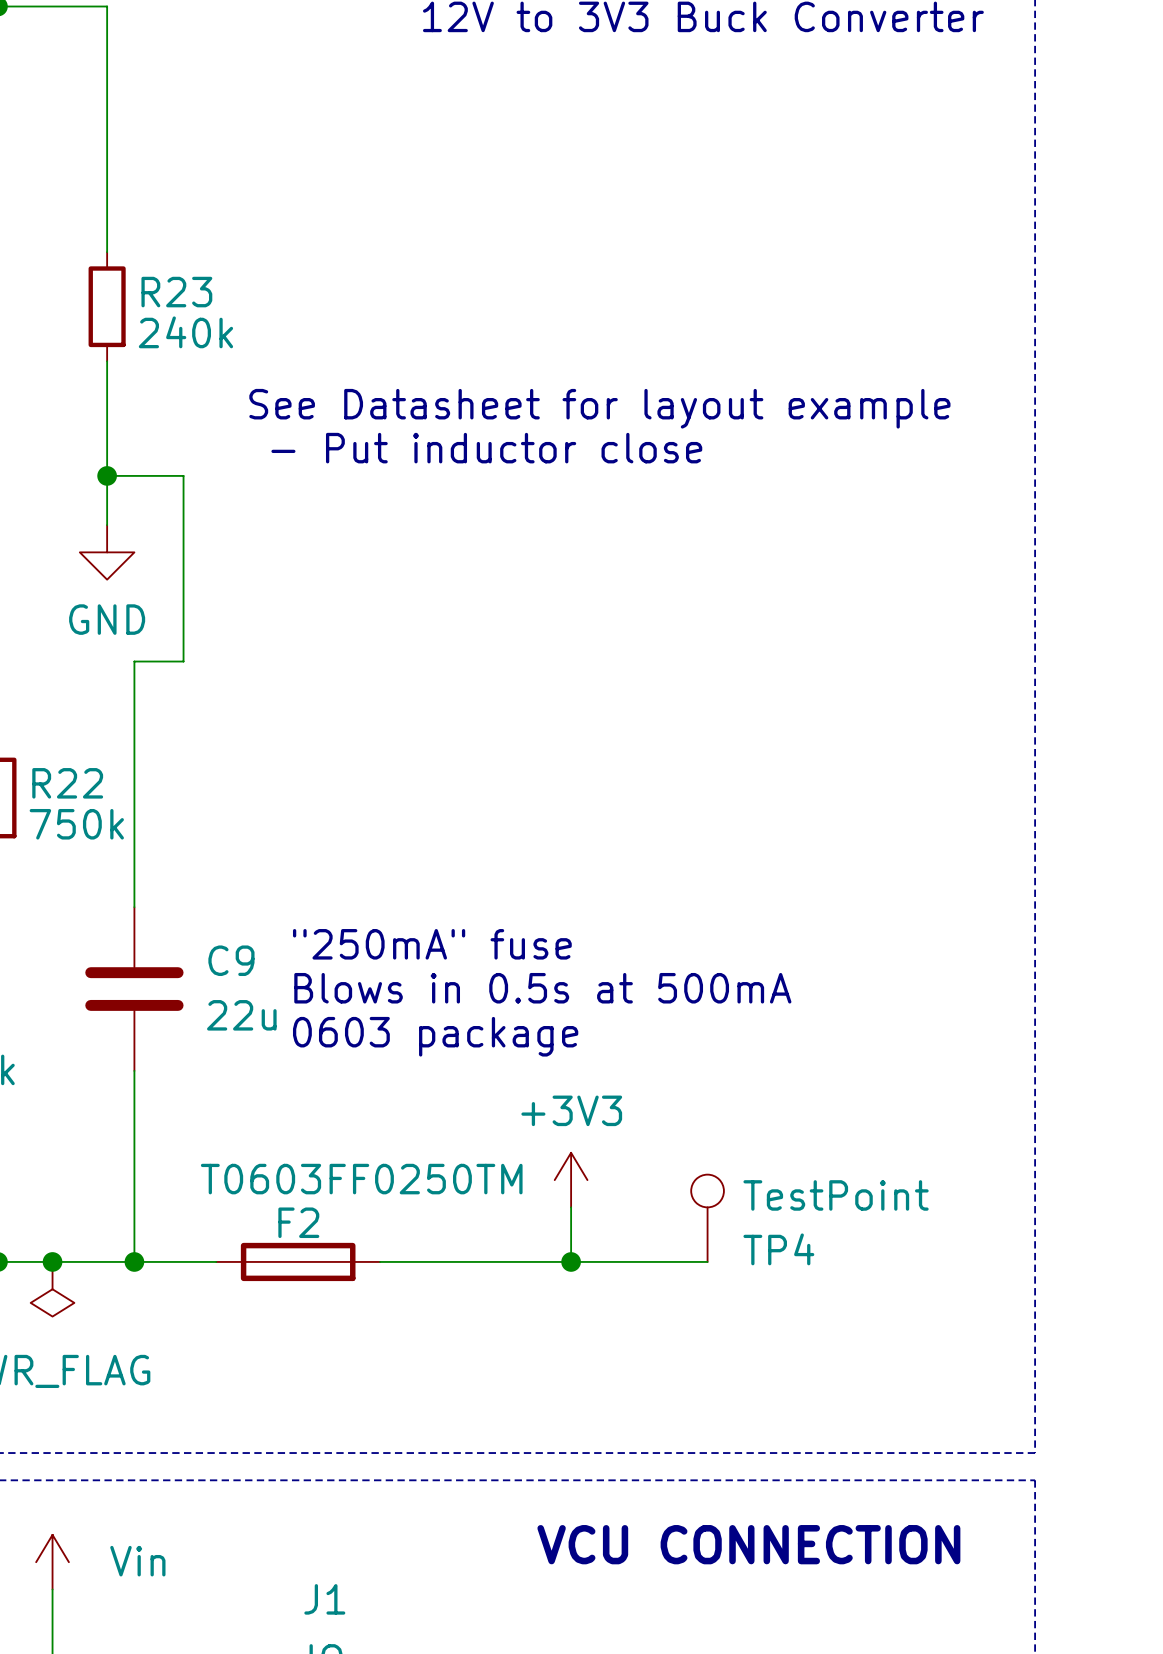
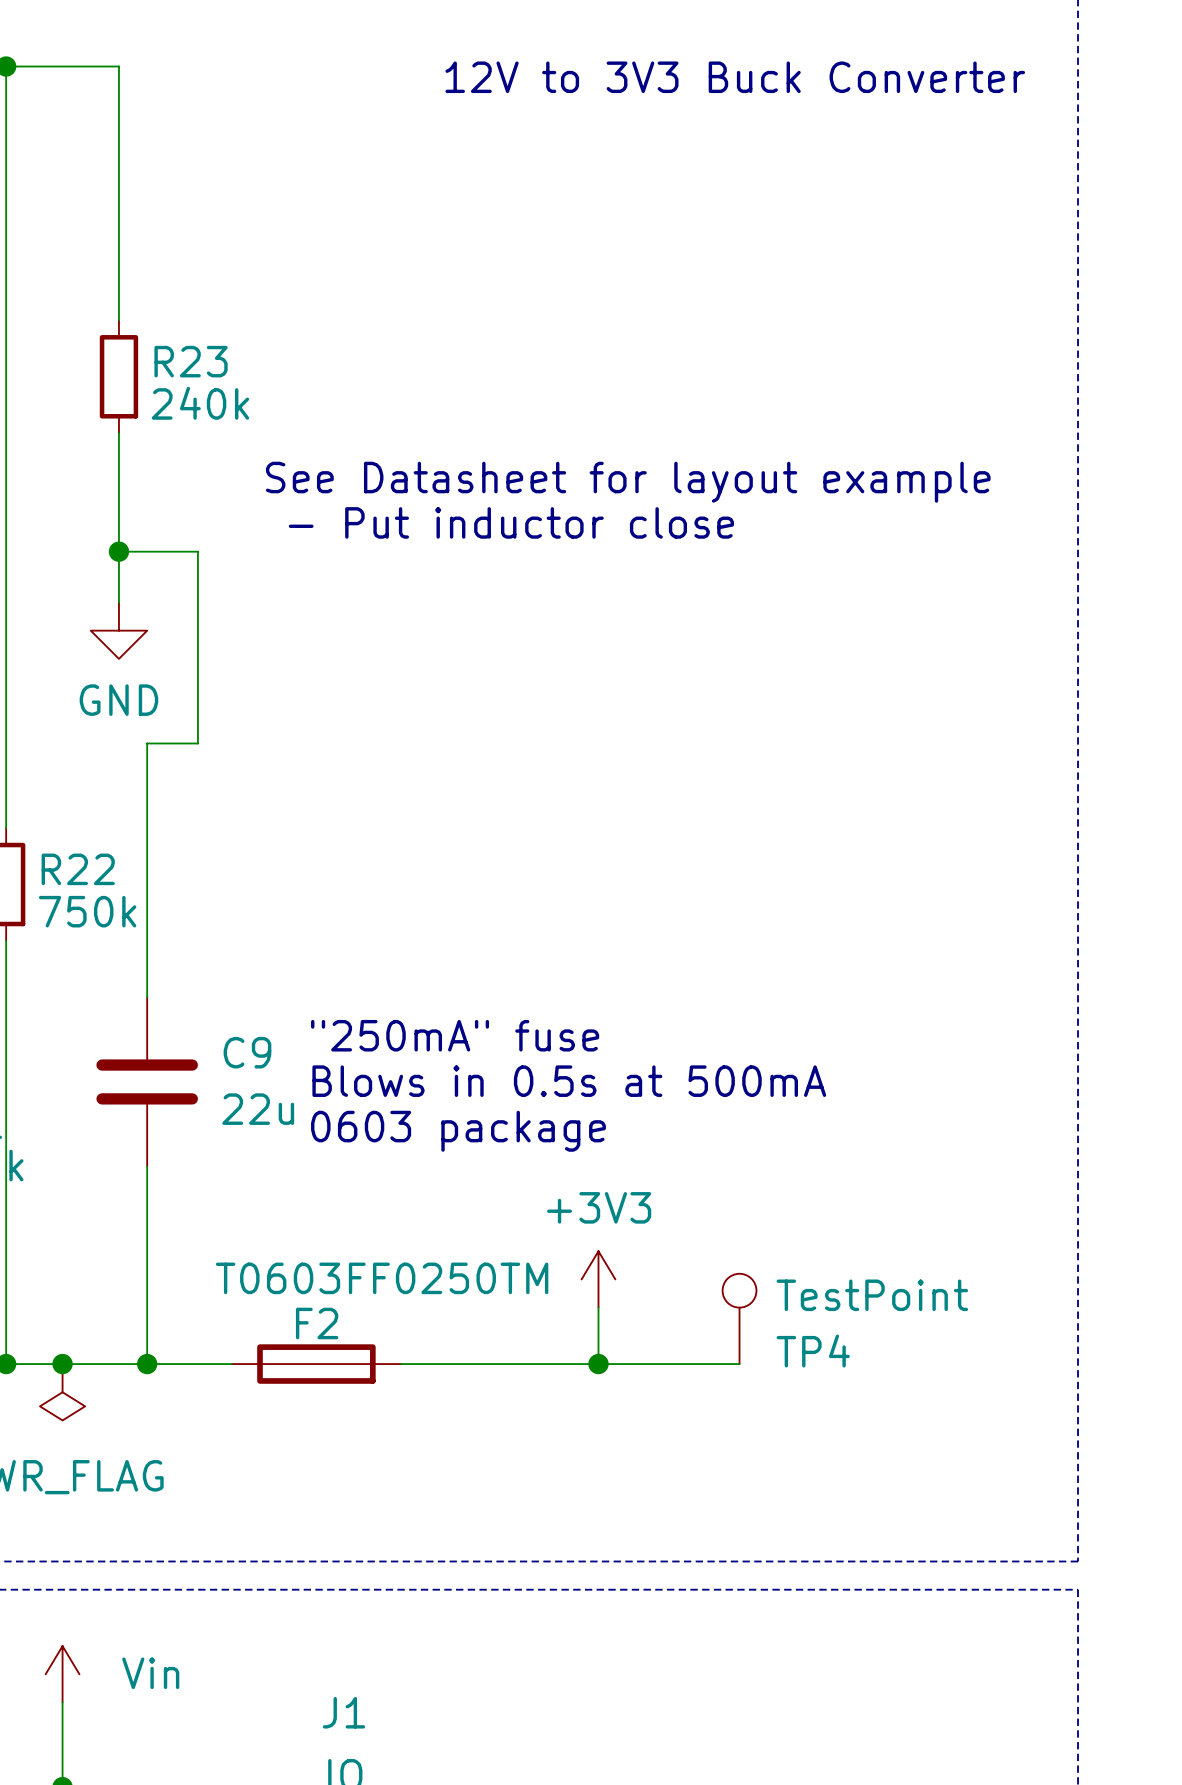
text: VCU CONNECTION (748, 1544) -> none

